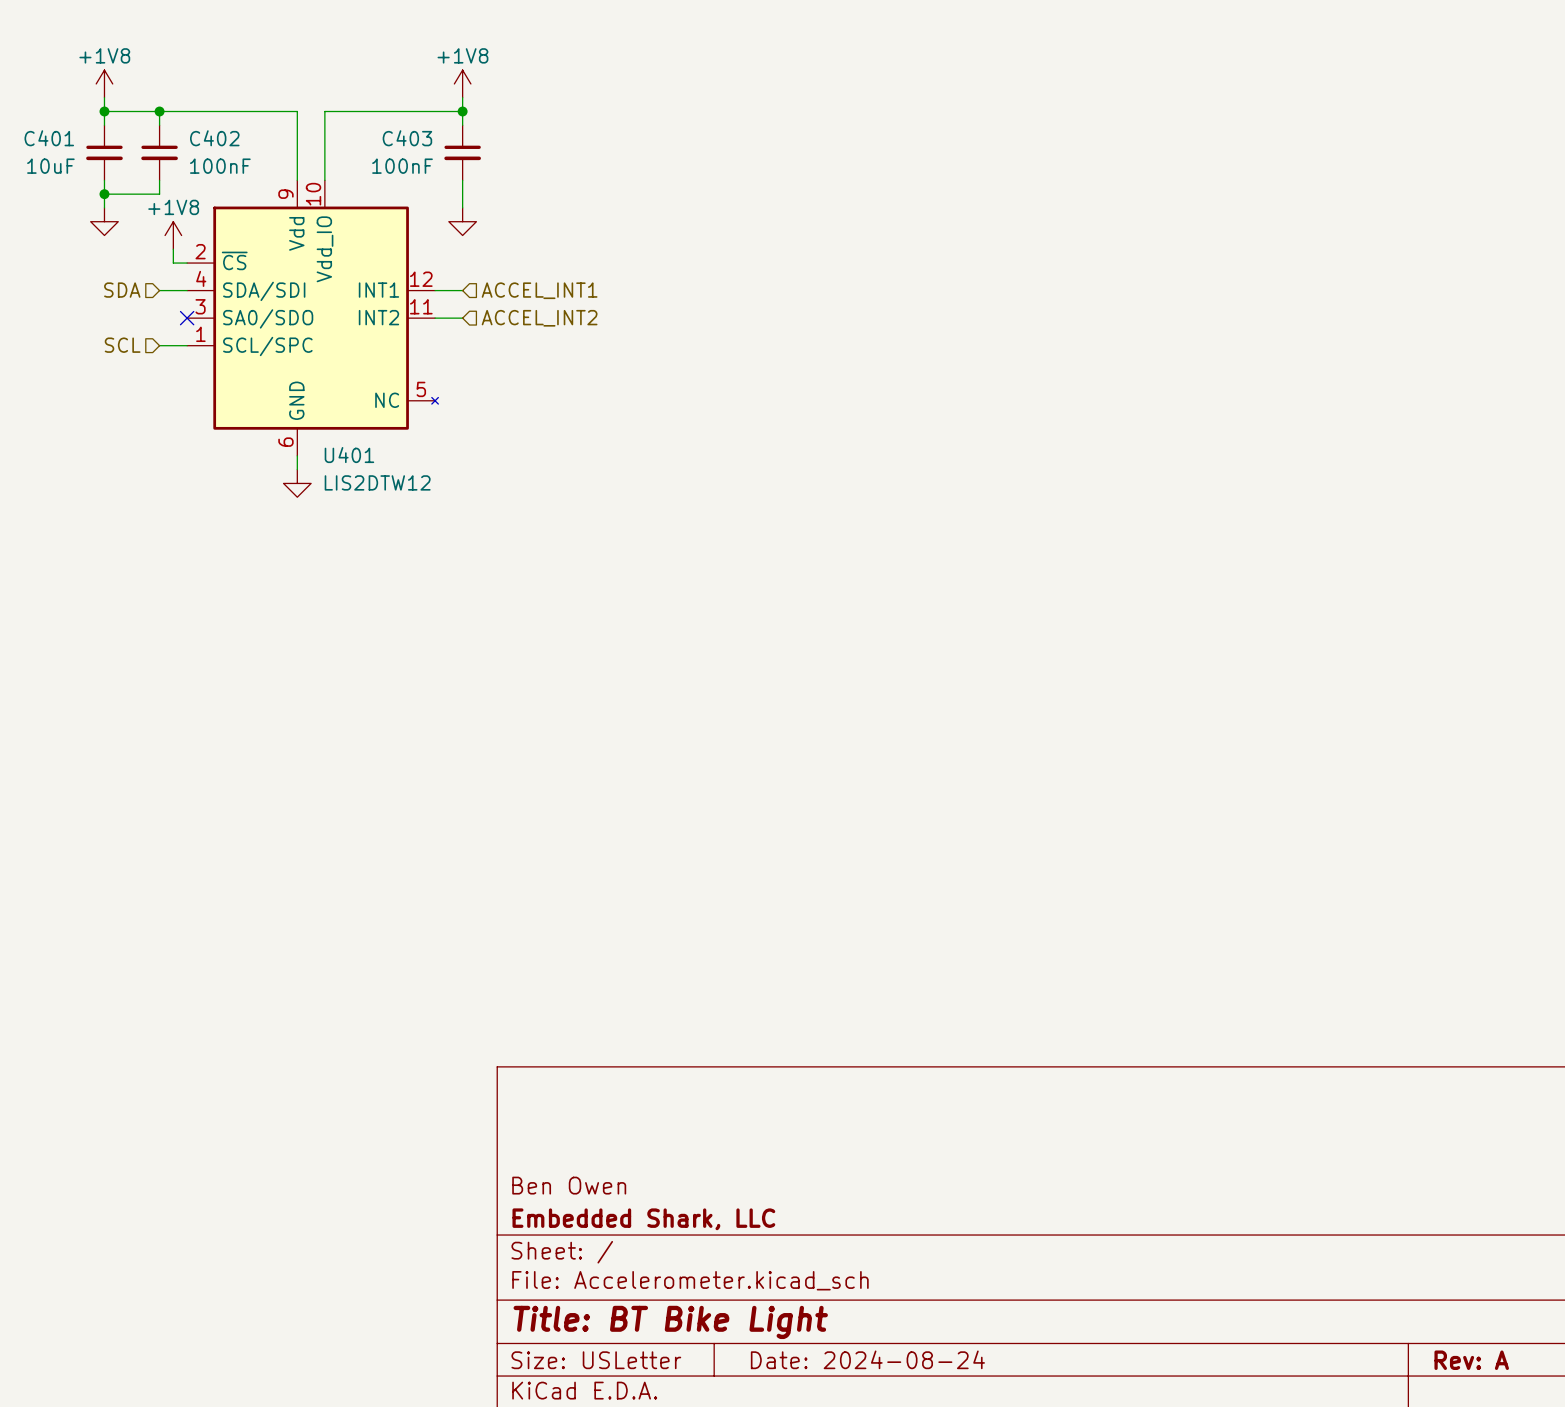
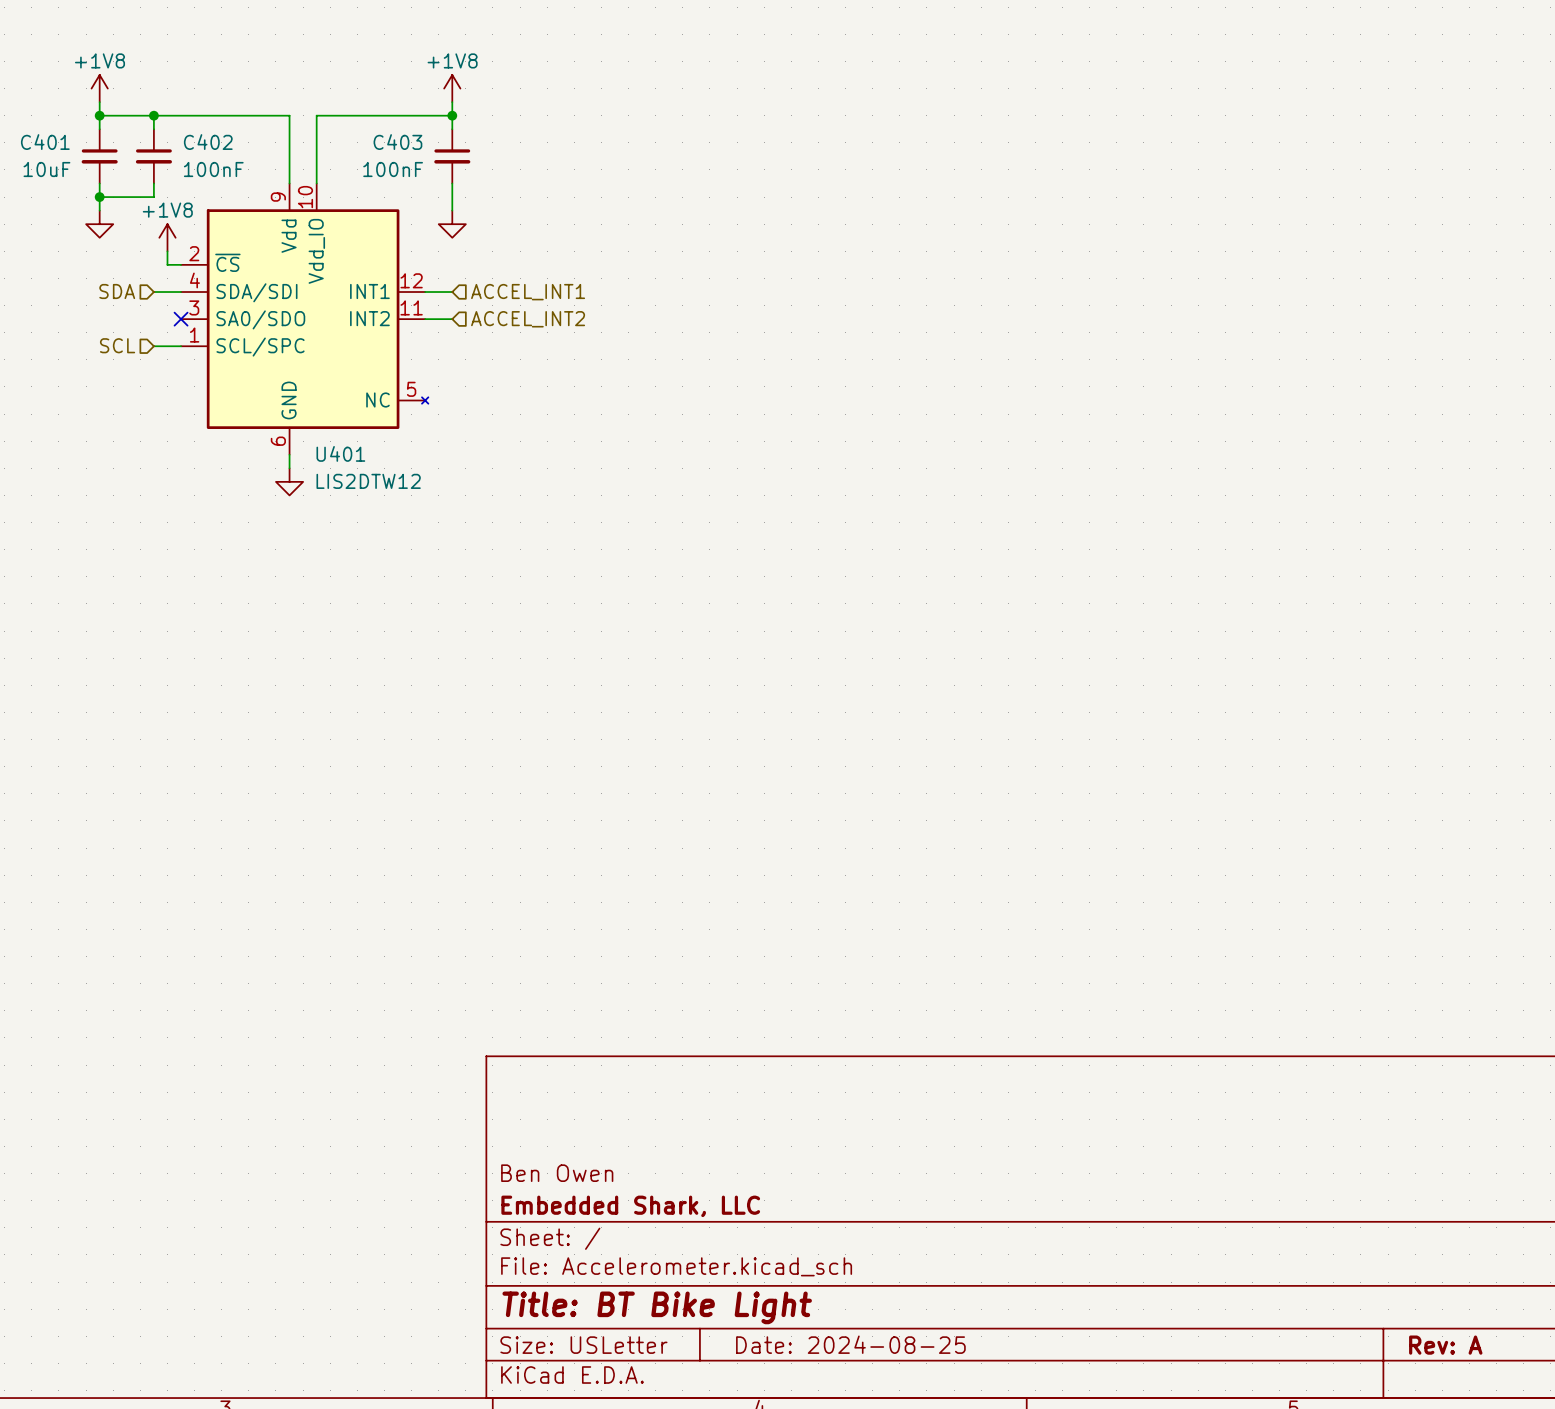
title block: Date: 2024-08-24 (867, 1359) -> Date: 2024-08-25 (850, 1344)

